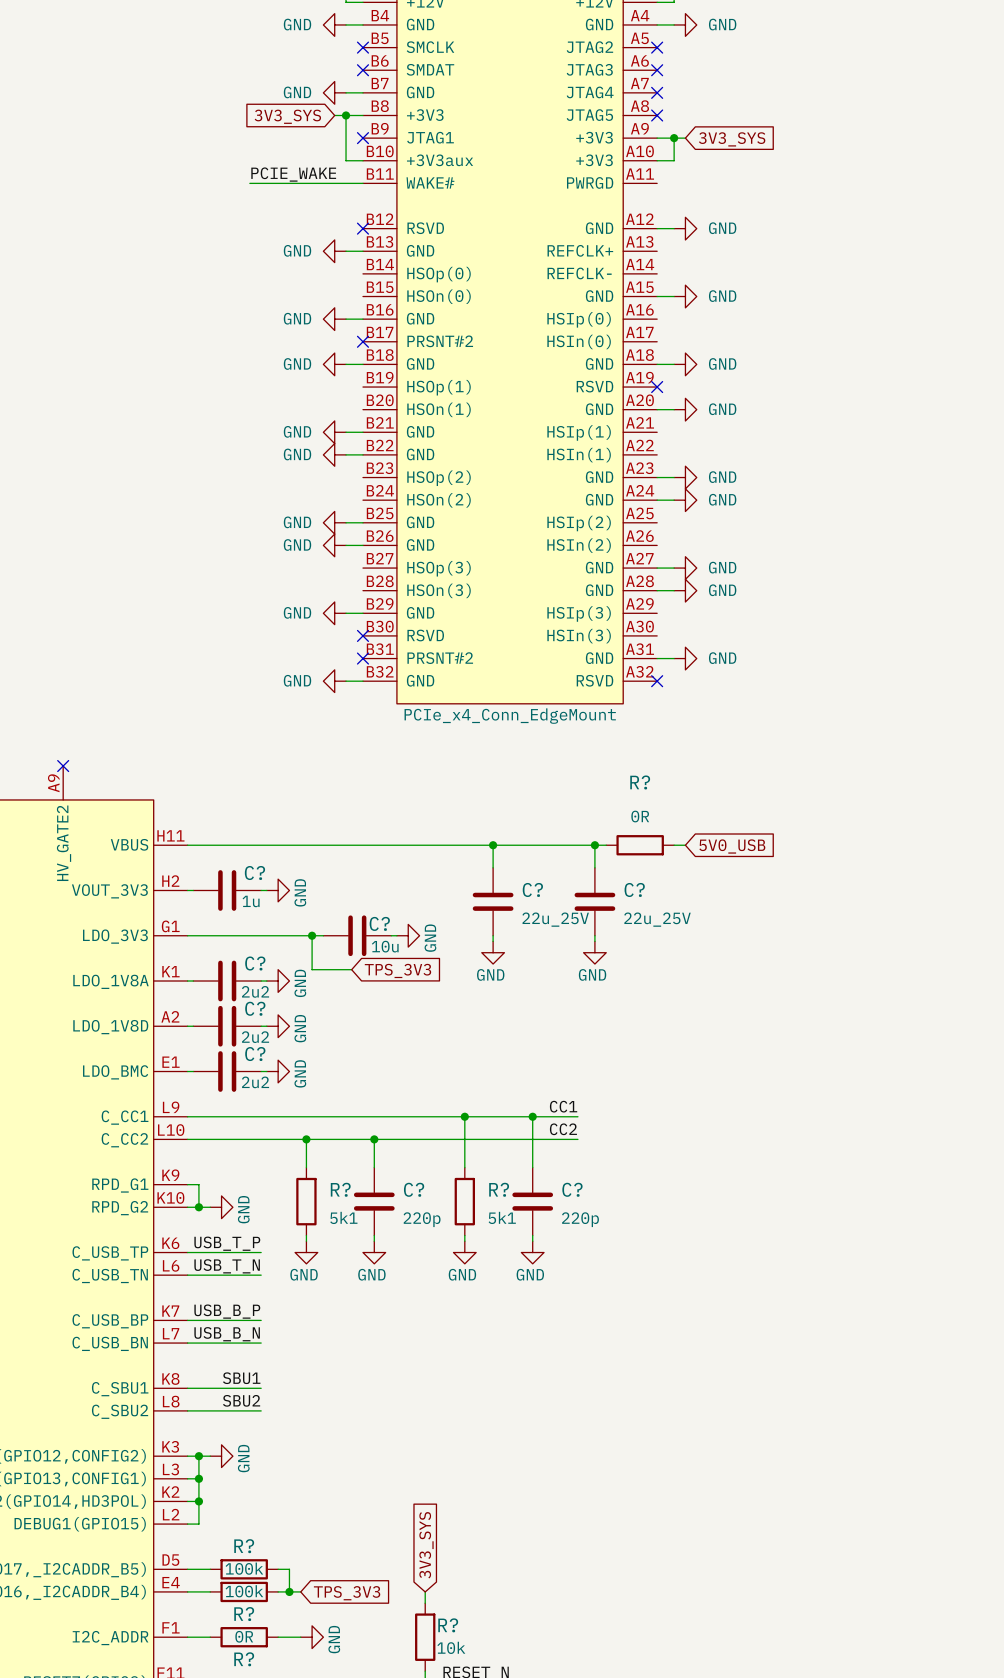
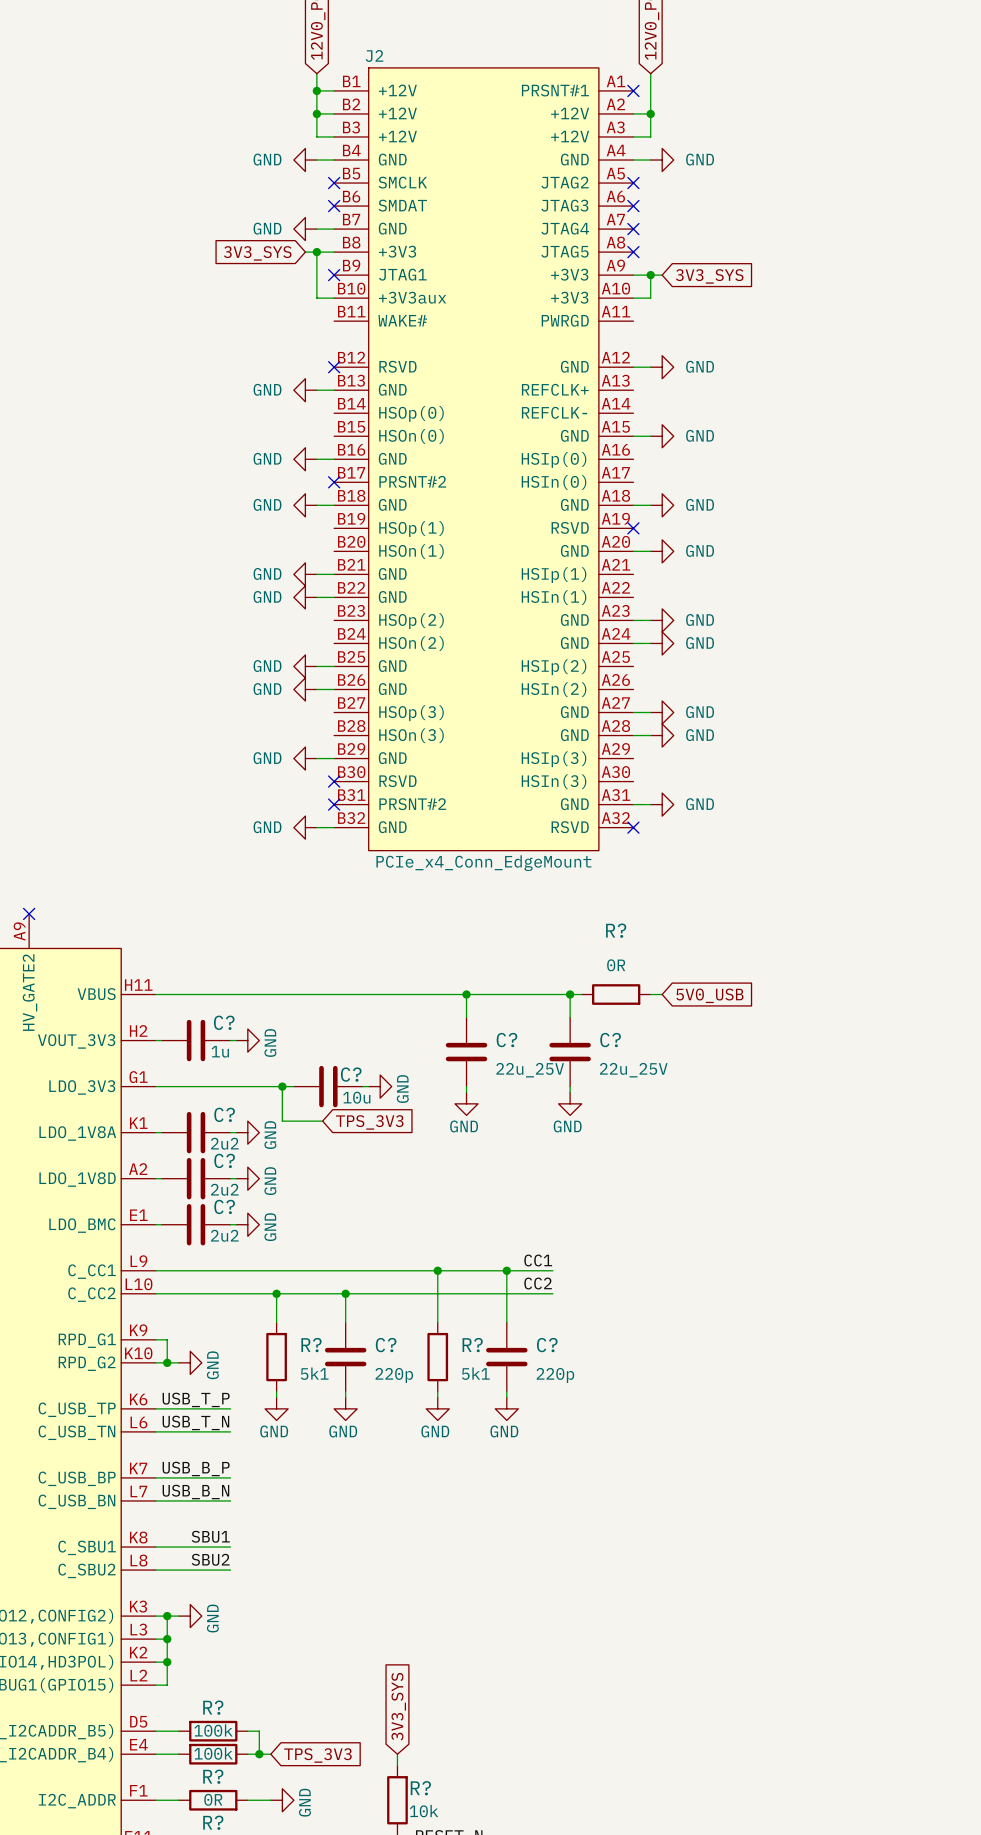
label: PCIE_WAKE (293, 174) -> none
wire: (249, 183) (362, 183) -> none

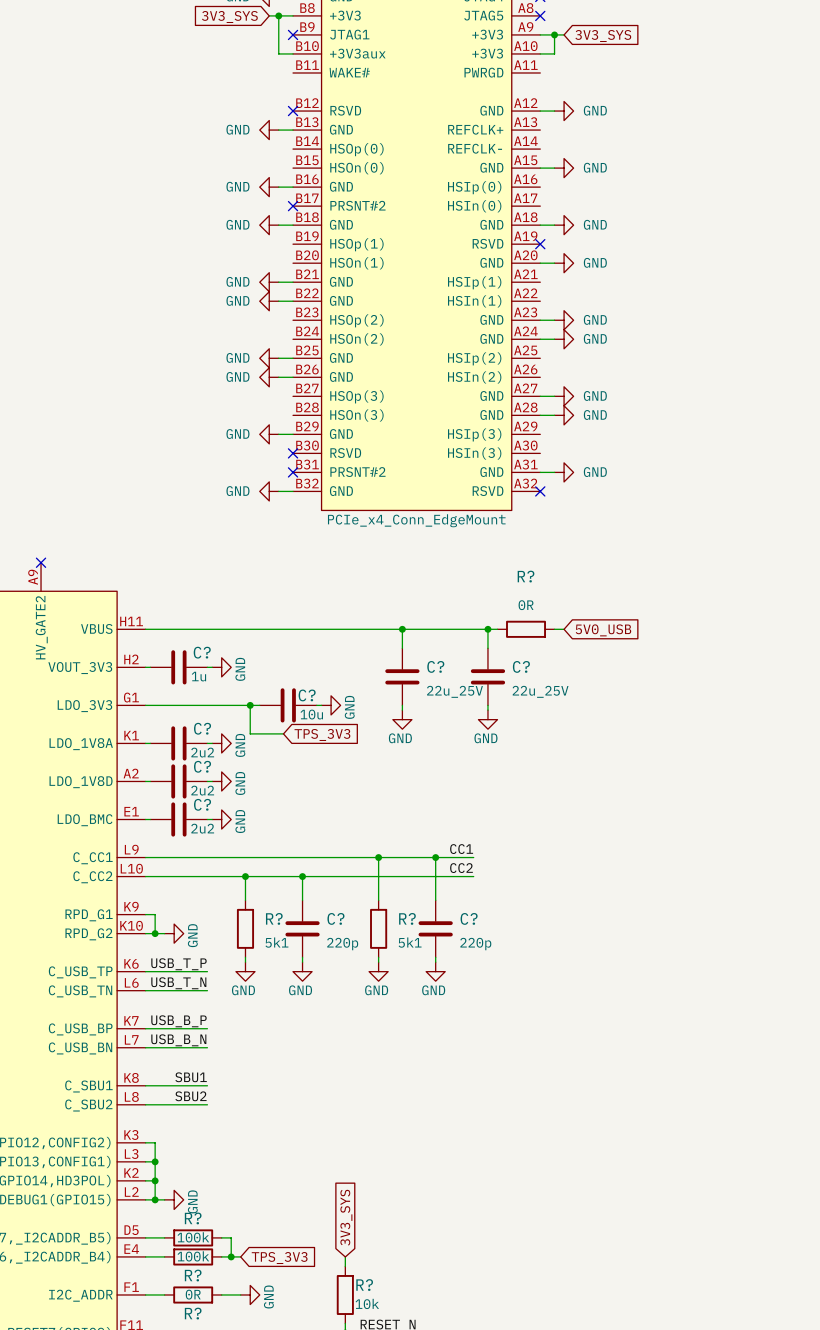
wire: (167, 1616) (178, 1616) -> (155, 1199) (164, 1199)
junction: (167, 1616) -> none
power symbol position: GND (190, 1616) -> GND (174, 1199)
junction: none -> (155, 1199)

